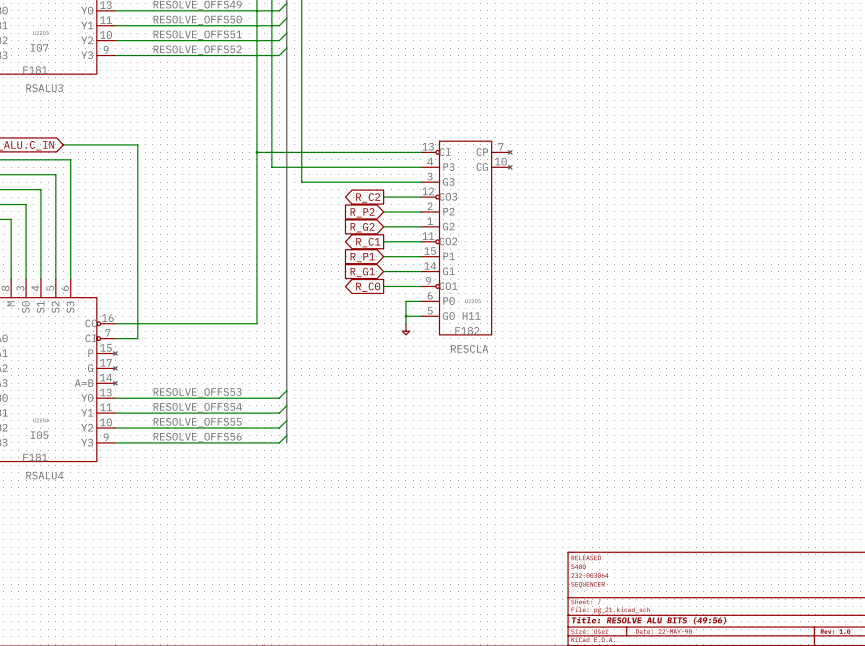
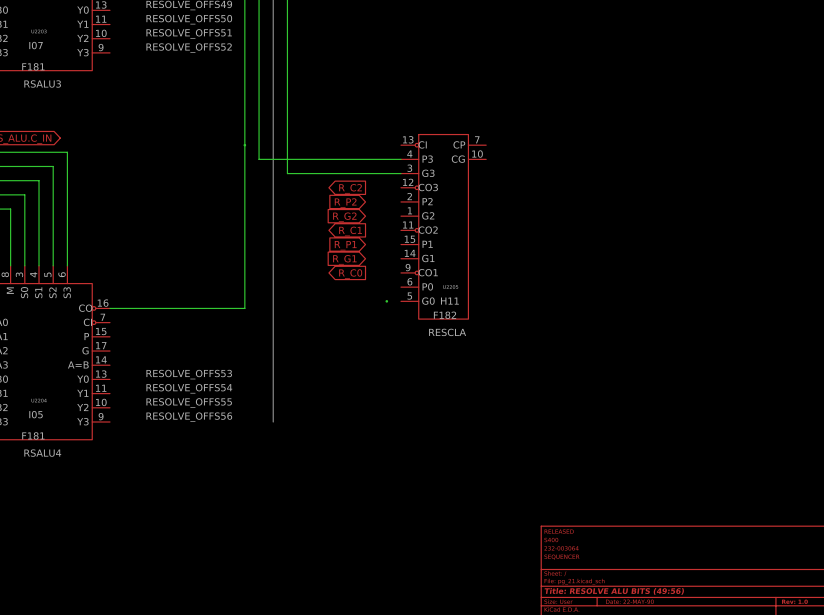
wire: (286, 3) (279, 10) (115, 10) -> none
wire: (286, 18) (279, 25) (115, 25) -> none
wire: (286, 33) (279, 40) (115, 40) -> none
wire: (286, 48) (279, 55) (115, 55) -> none
wire: (63, 144) (137, 144) (137, 338) (115, 338) -> none
wire: (256, 152) (420, 152) -> none
no-connect mark: (510, 152) -> none
no-connect mark: (510, 167) -> none
wire: (383, 197) (420, 197) -> none
wire: (383, 211) (420, 211) -> none
wire: (383, 226) (420, 226) -> none
wire: (383, 241) (420, 241) -> none
wire: (383, 256) (420, 256) -> none
wire: (383, 271) (420, 271) -> none
wire: (383, 286) (420, 286) -> none
wire: (420, 301) (405, 301) (405, 323) -> none
wire: (405, 316) (420, 316) -> none
power symbol: (405, 329) -> none
no-connect mark: (115, 353) -> none
no-connect mark: (115, 368) -> none
no-connect mark: (115, 383) -> none
wire: (286, 390) (279, 398) (115, 398) -> none
wire: (286, 405) (279, 413) (115, 413) -> none
wire: (286, 420) (279, 428) (115, 428) -> none
wire: (286, 435) (279, 442) (115, 442) -> none

